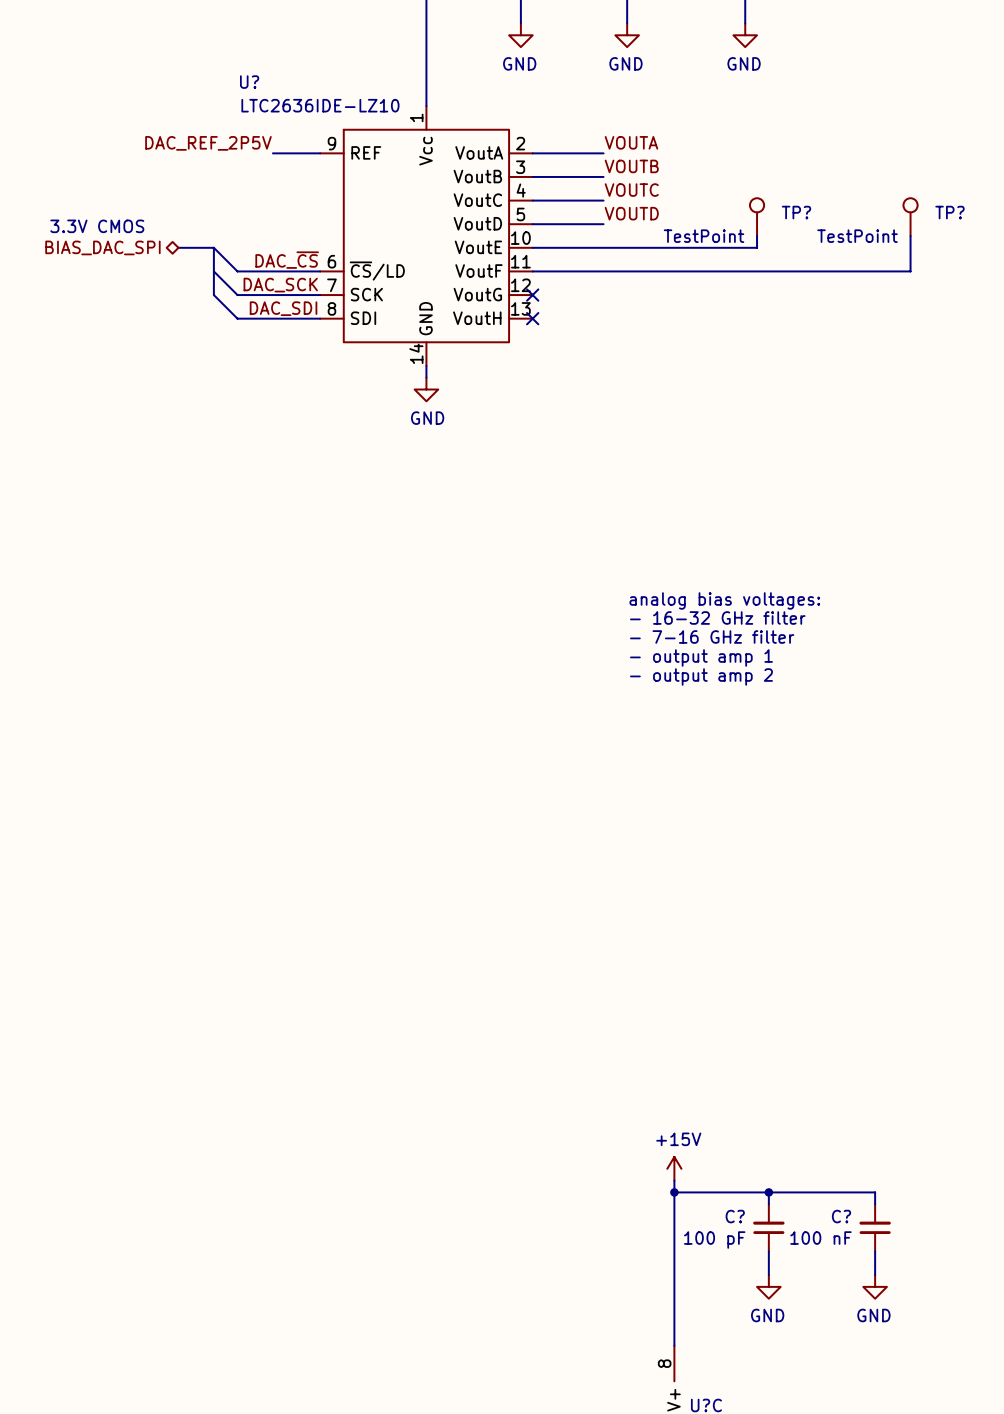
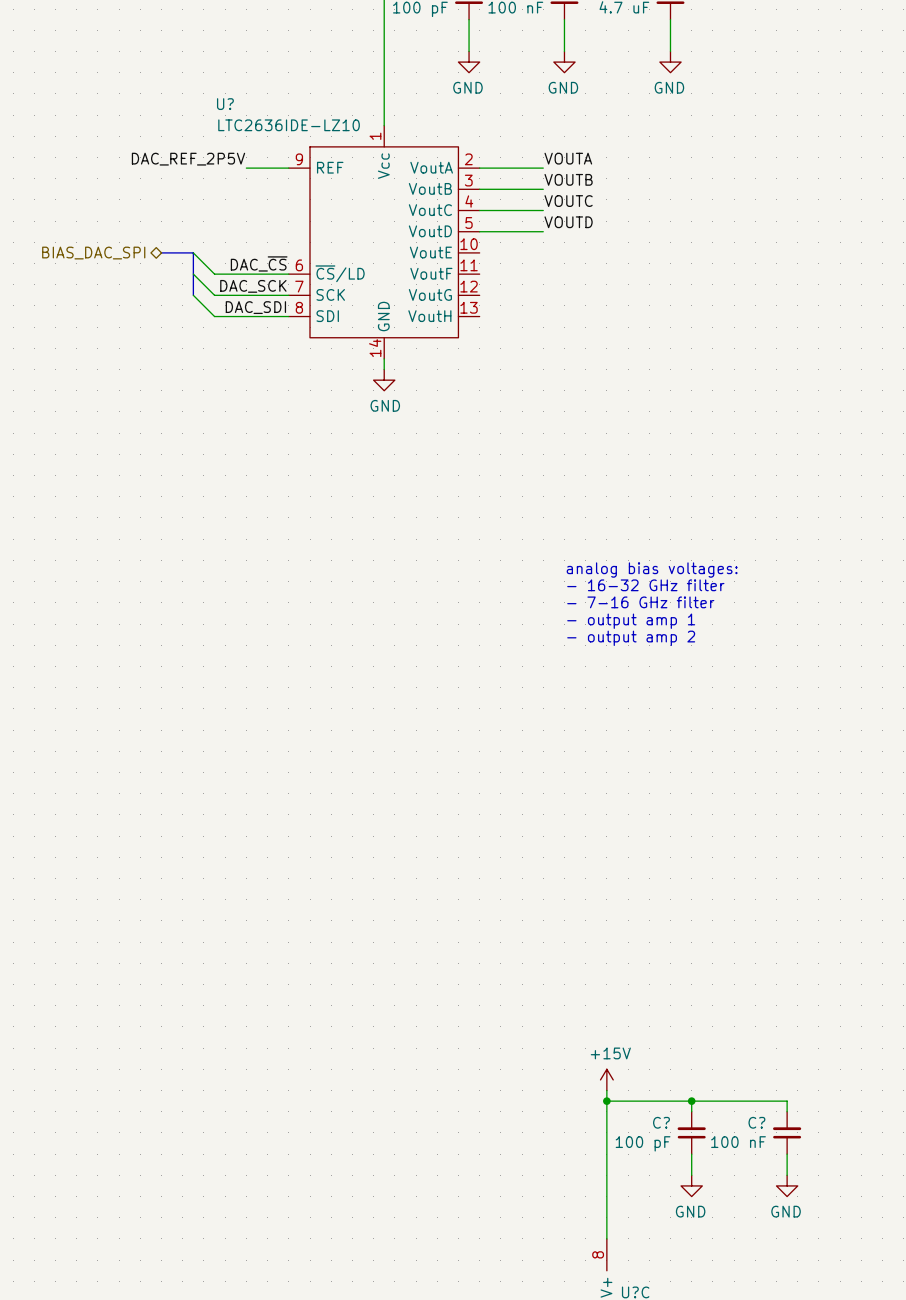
TP?: TestPoint (757, 217) -> none
TP?: TestPoint (910, 217) -> none
text: 3.3V CMOS (97, 226) -> none
wire: (757, 236) (757, 247) (532, 247) -> none
wire: (910, 236) (910, 271) (532, 271) -> none
no-connect mark: (532, 295) -> none
no-connect mark: (532, 318) -> none

